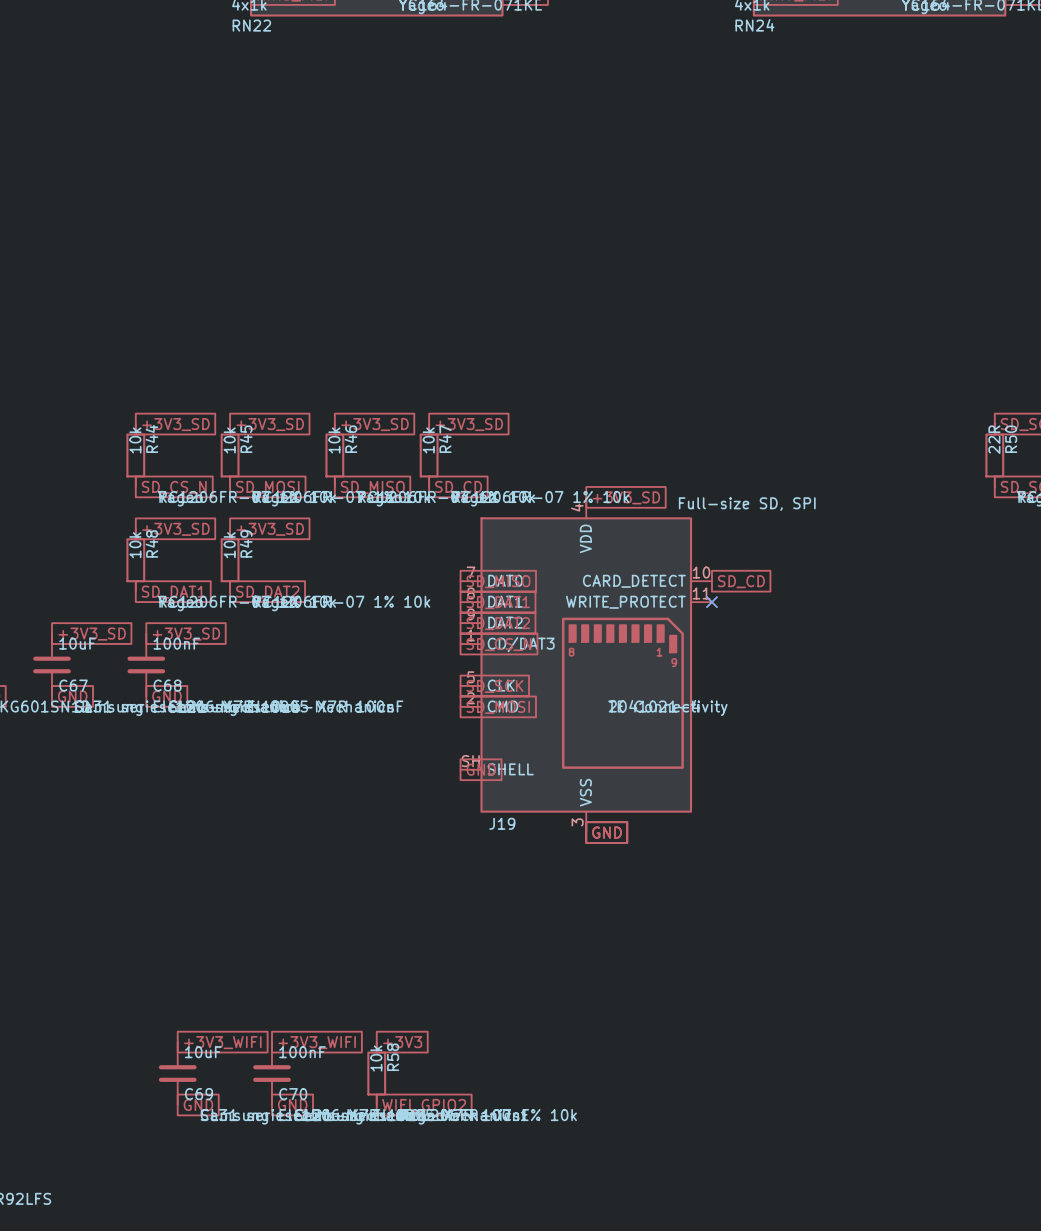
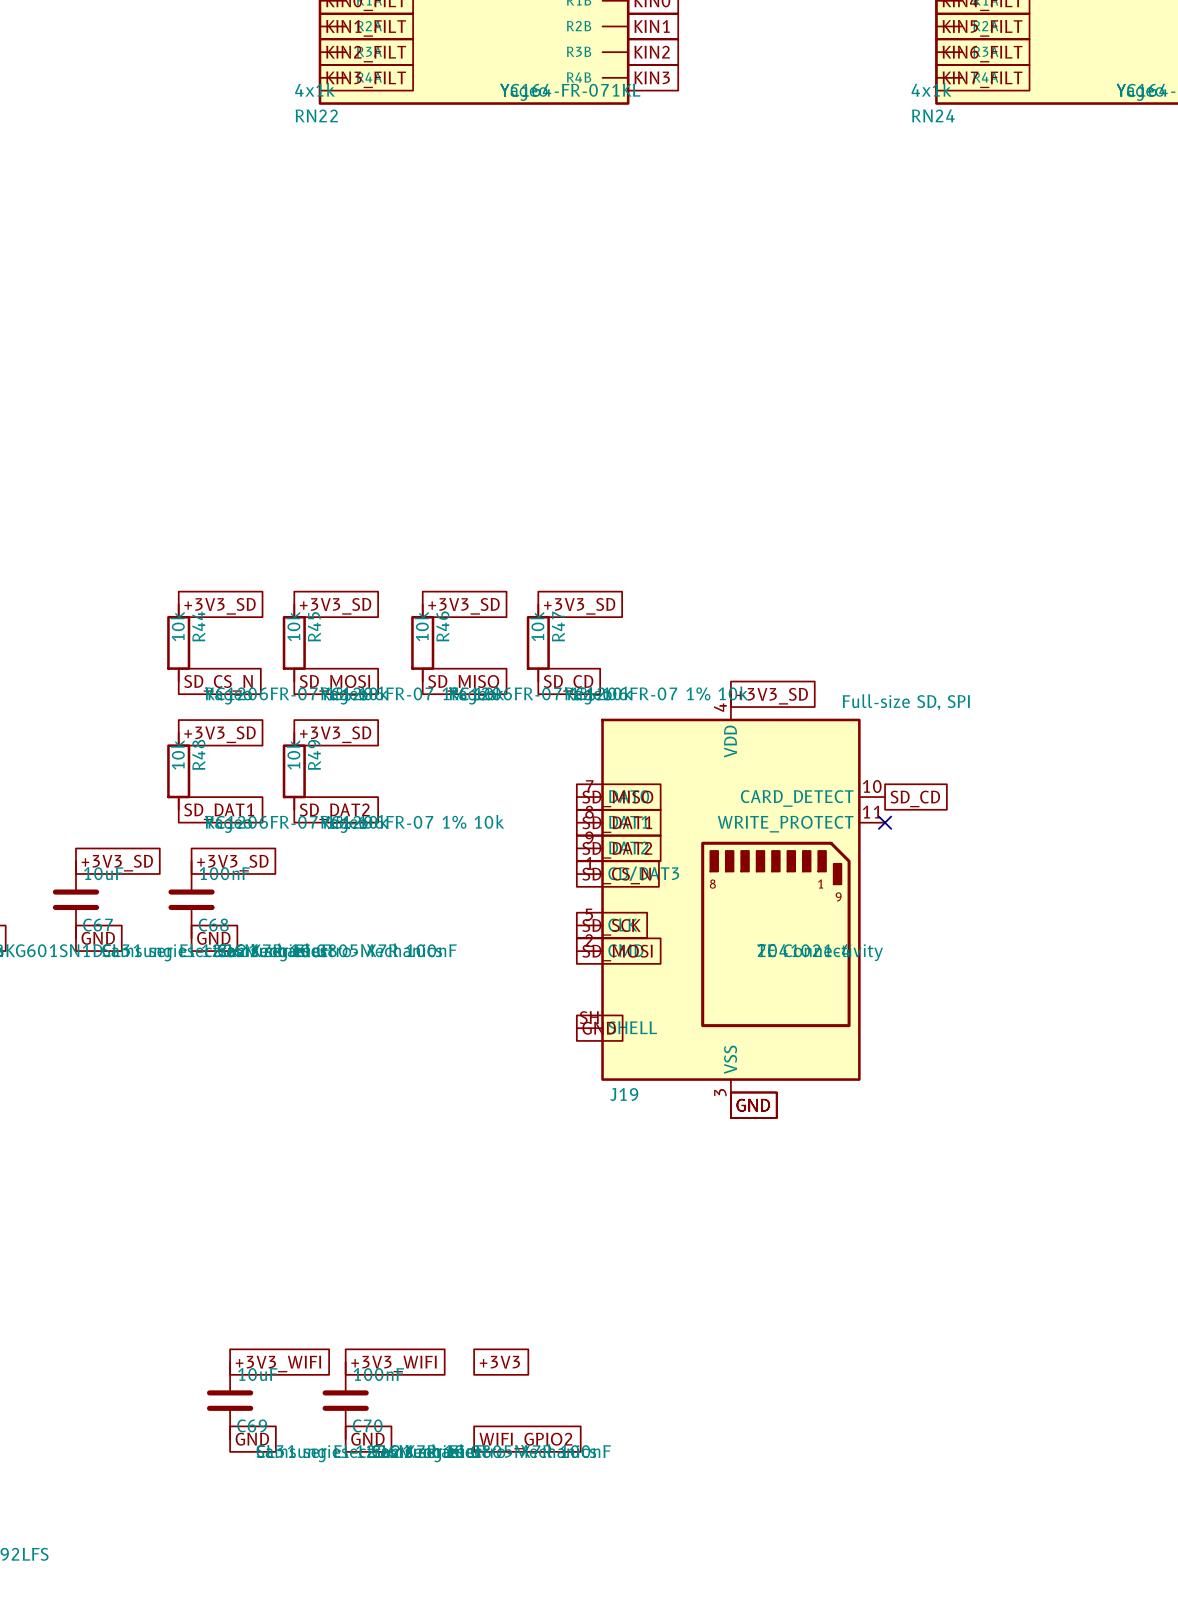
R58: 10k (376, 1073) -> none

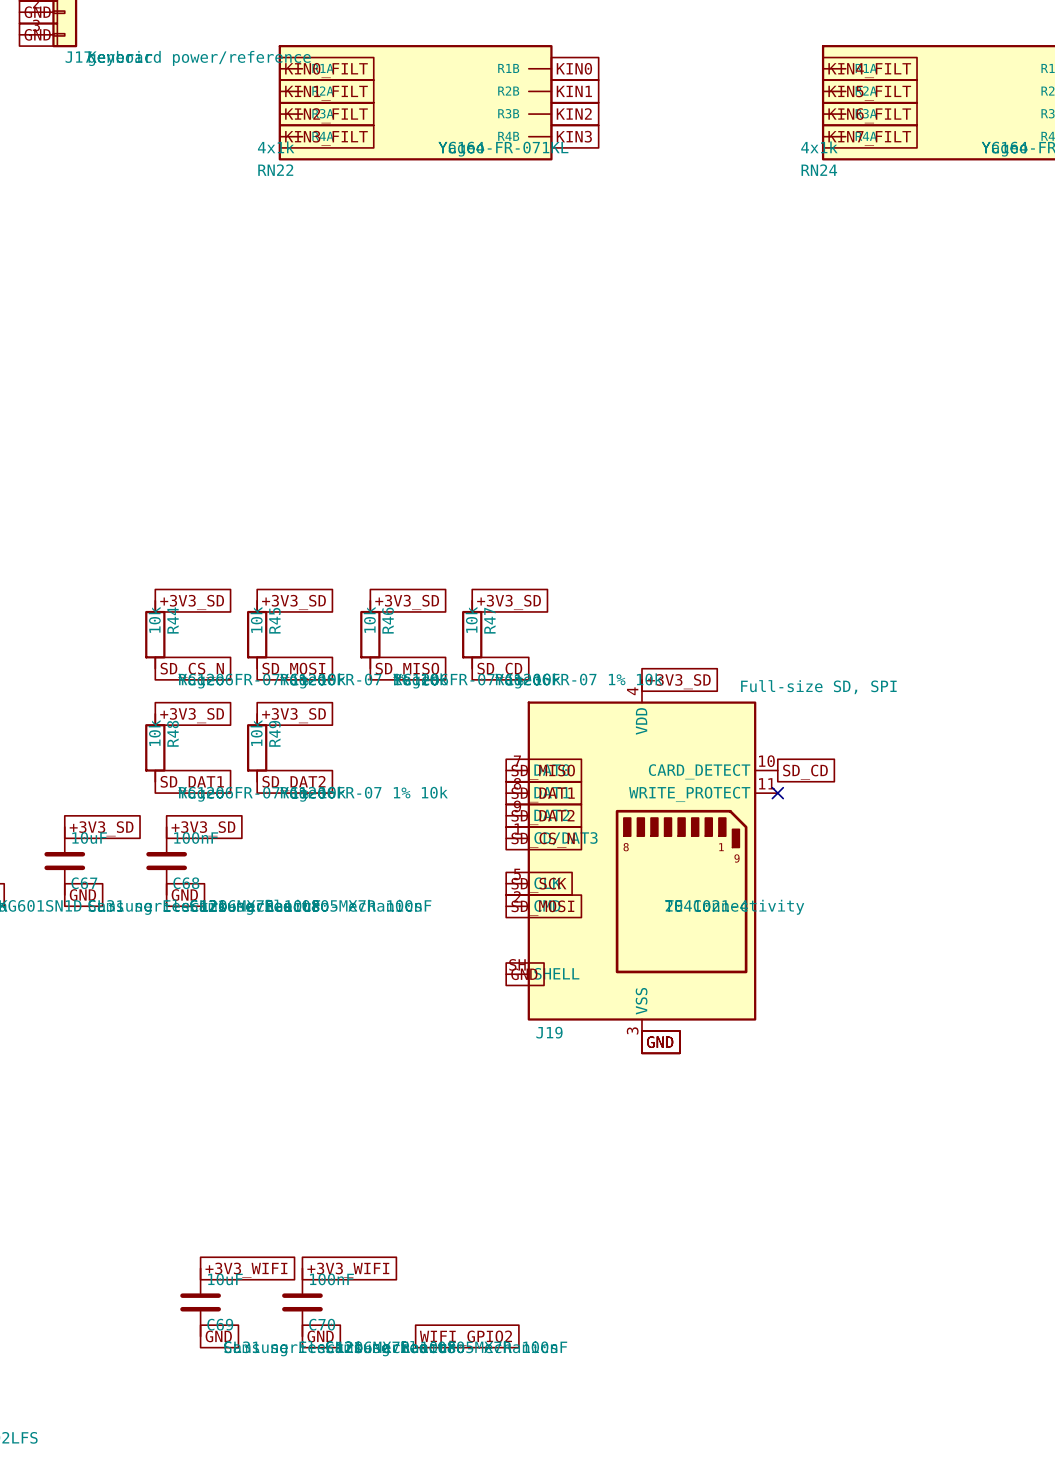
global label: +3V3 (499, 1362) -> none

